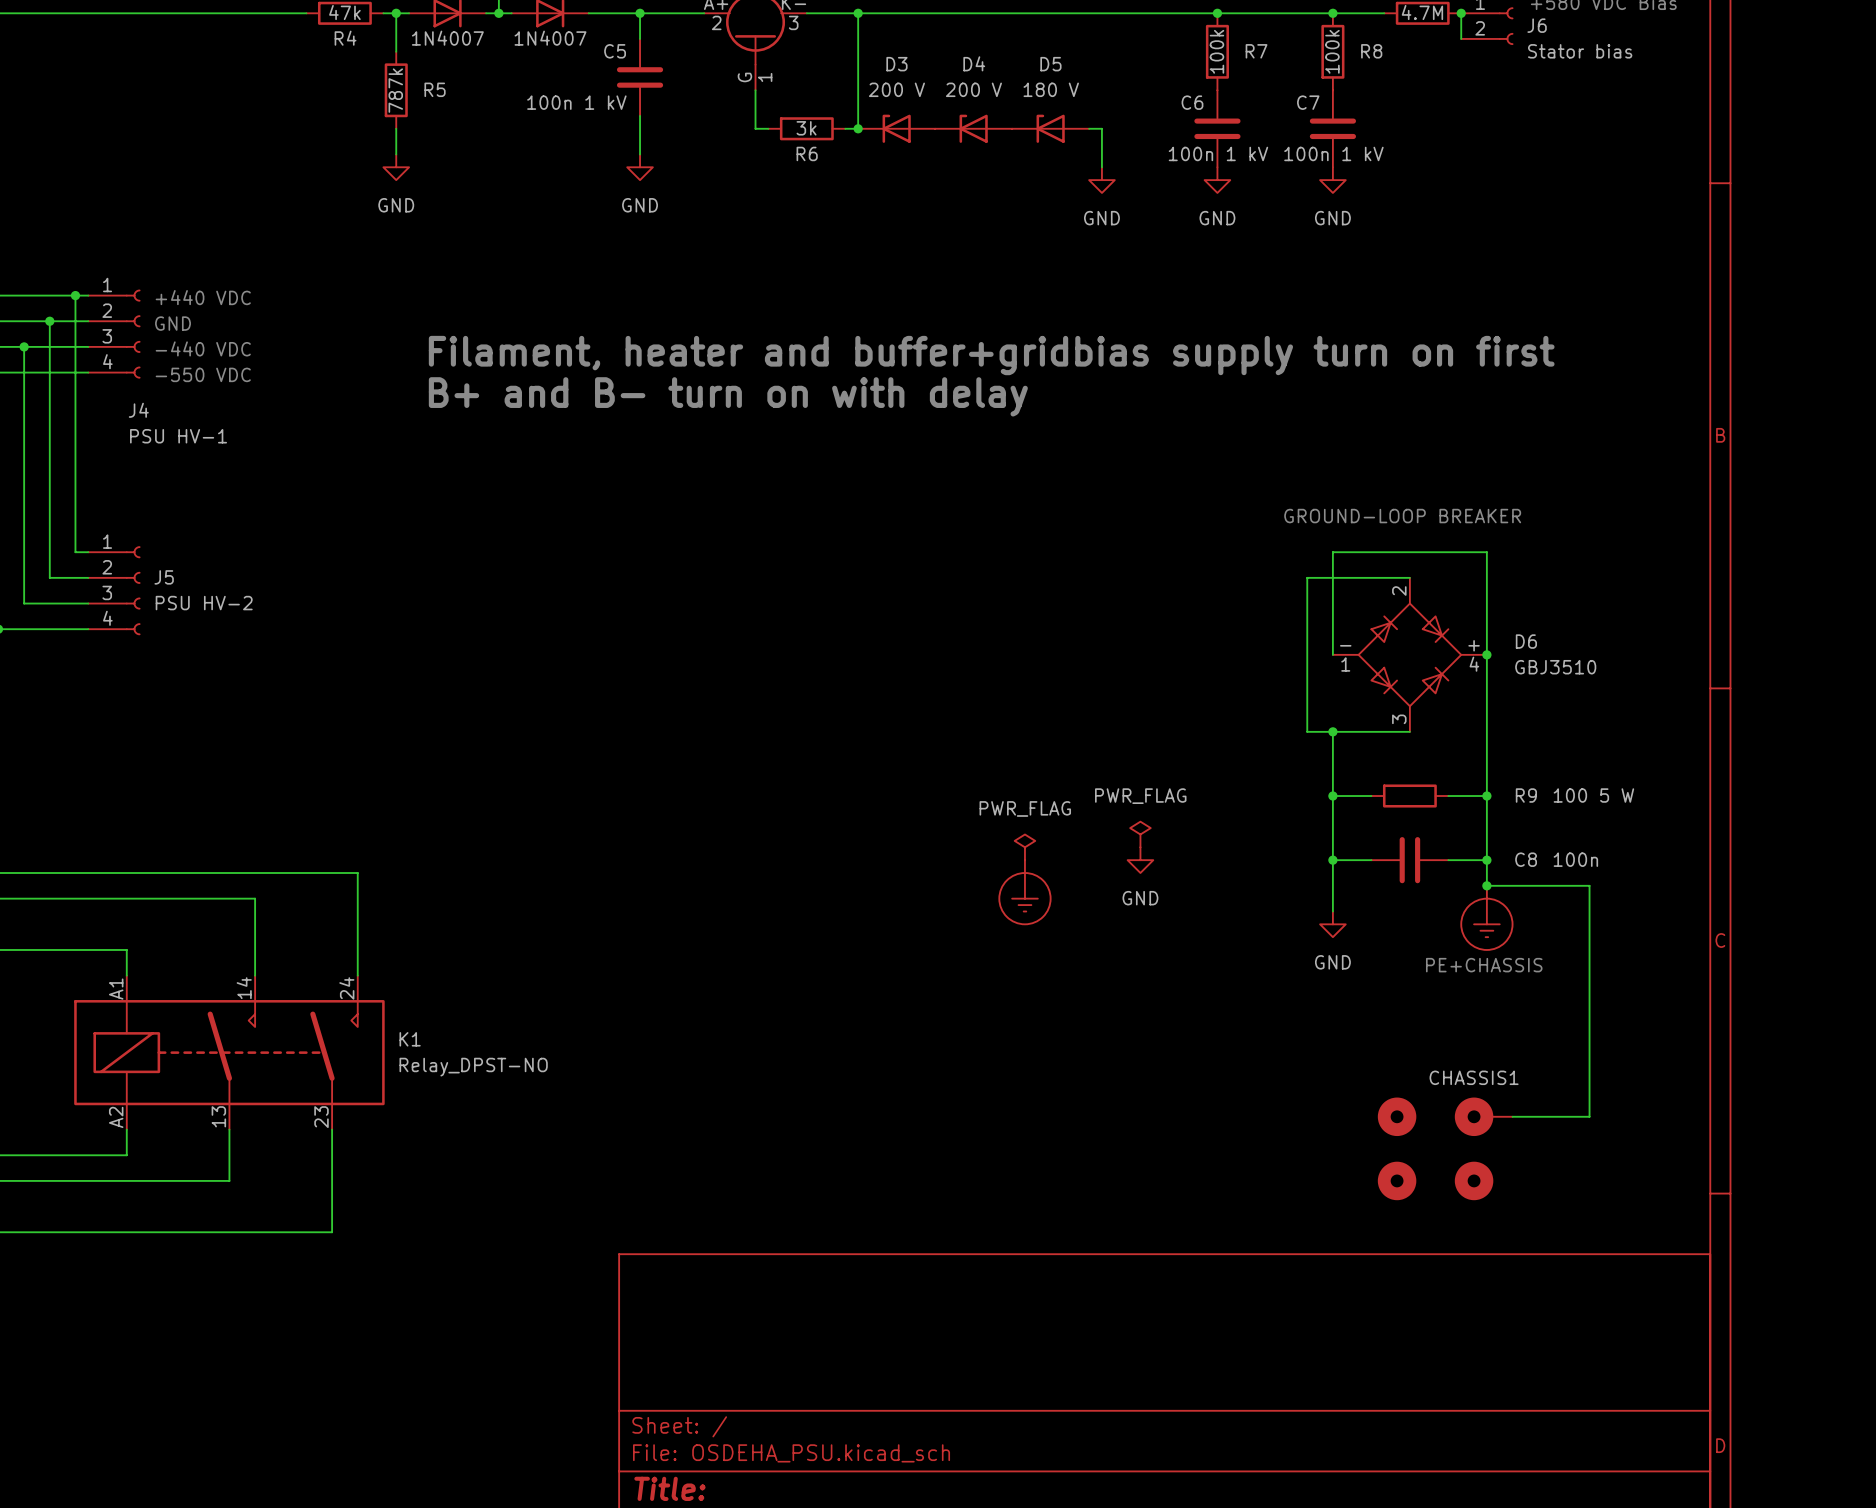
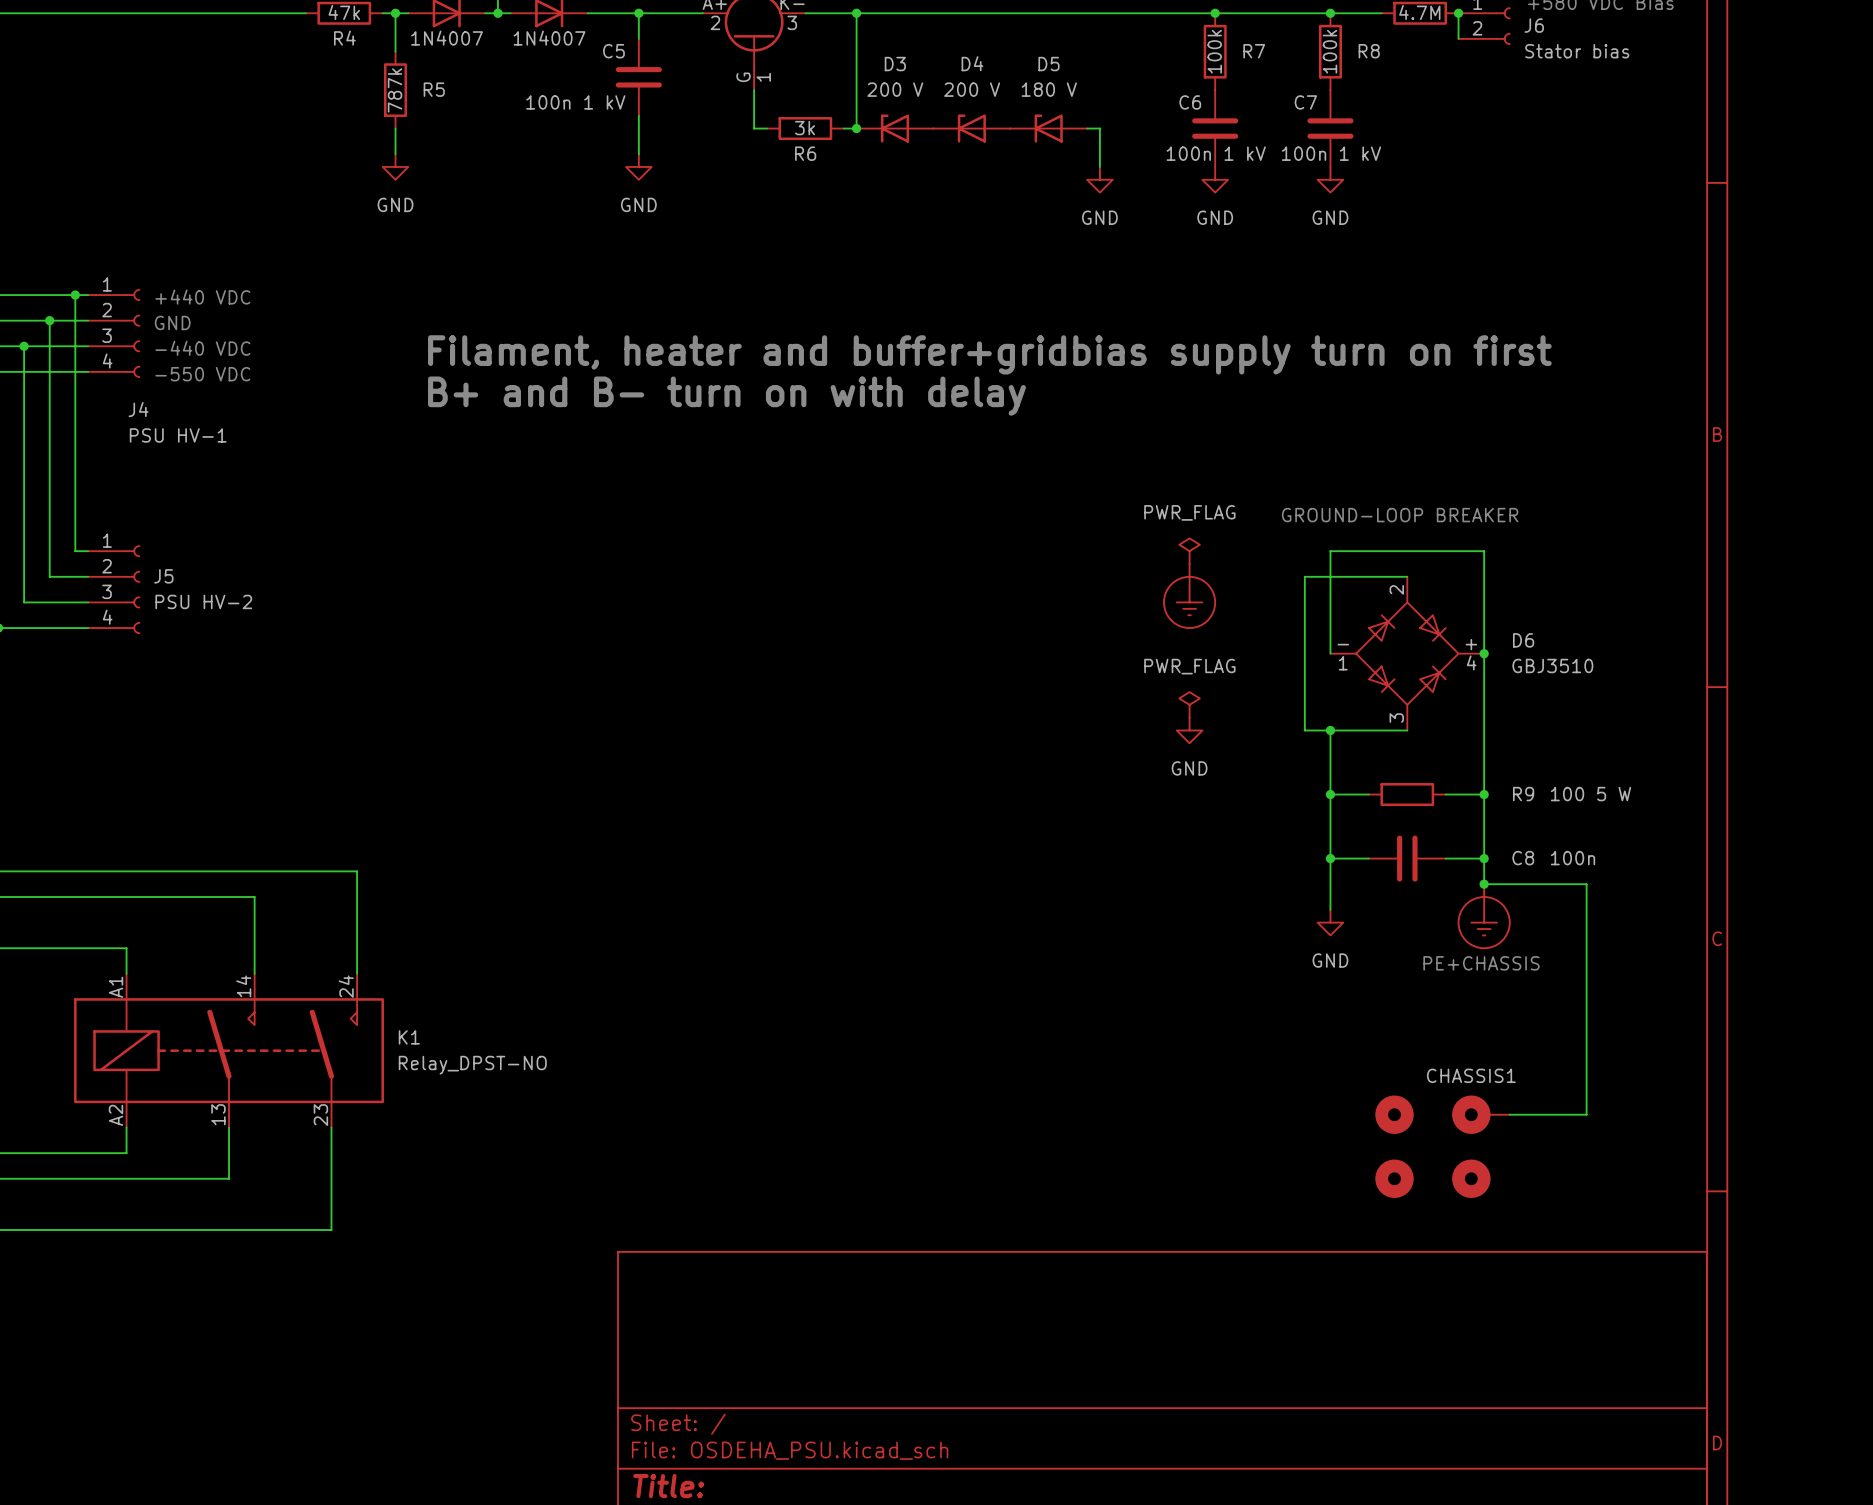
power symbol: none -> PWR_FLAG (1189, 551)
power symbol: none -> (1189, 596)
power symbol: none -> PWR_FLAG (1189, 704)
power symbol: PWR_FLAG (1140, 834) -> none
power symbol: PWR_FLAG (1024, 847) -> none
power symbol position: GND (1140, 860) -> GND (1189, 730)
power symbol: (1024, 892) -> none

